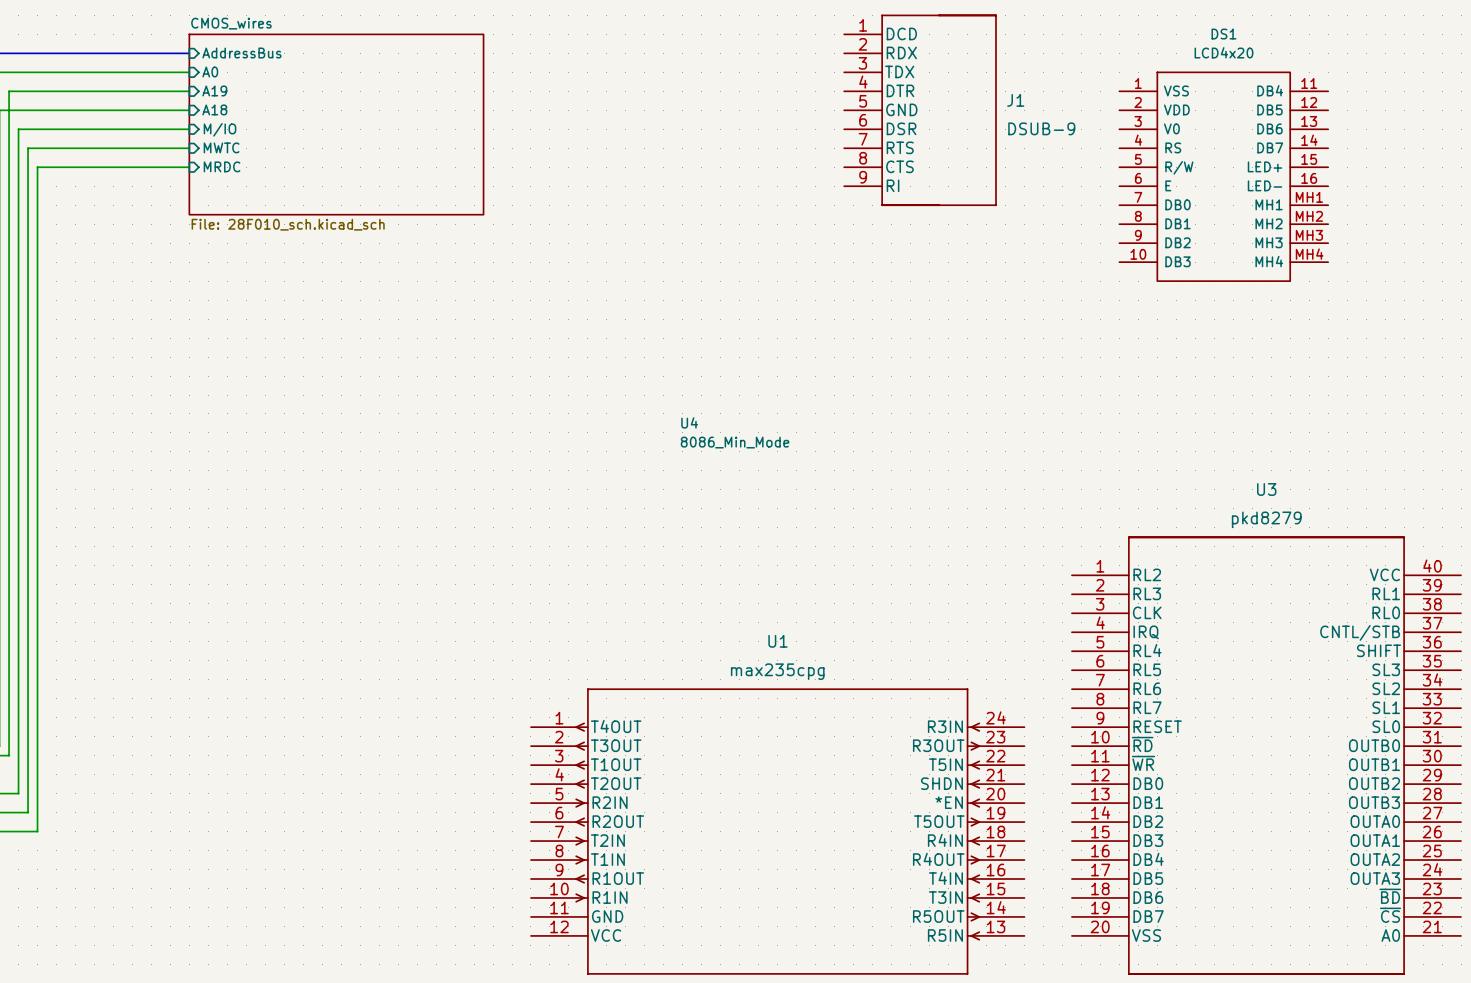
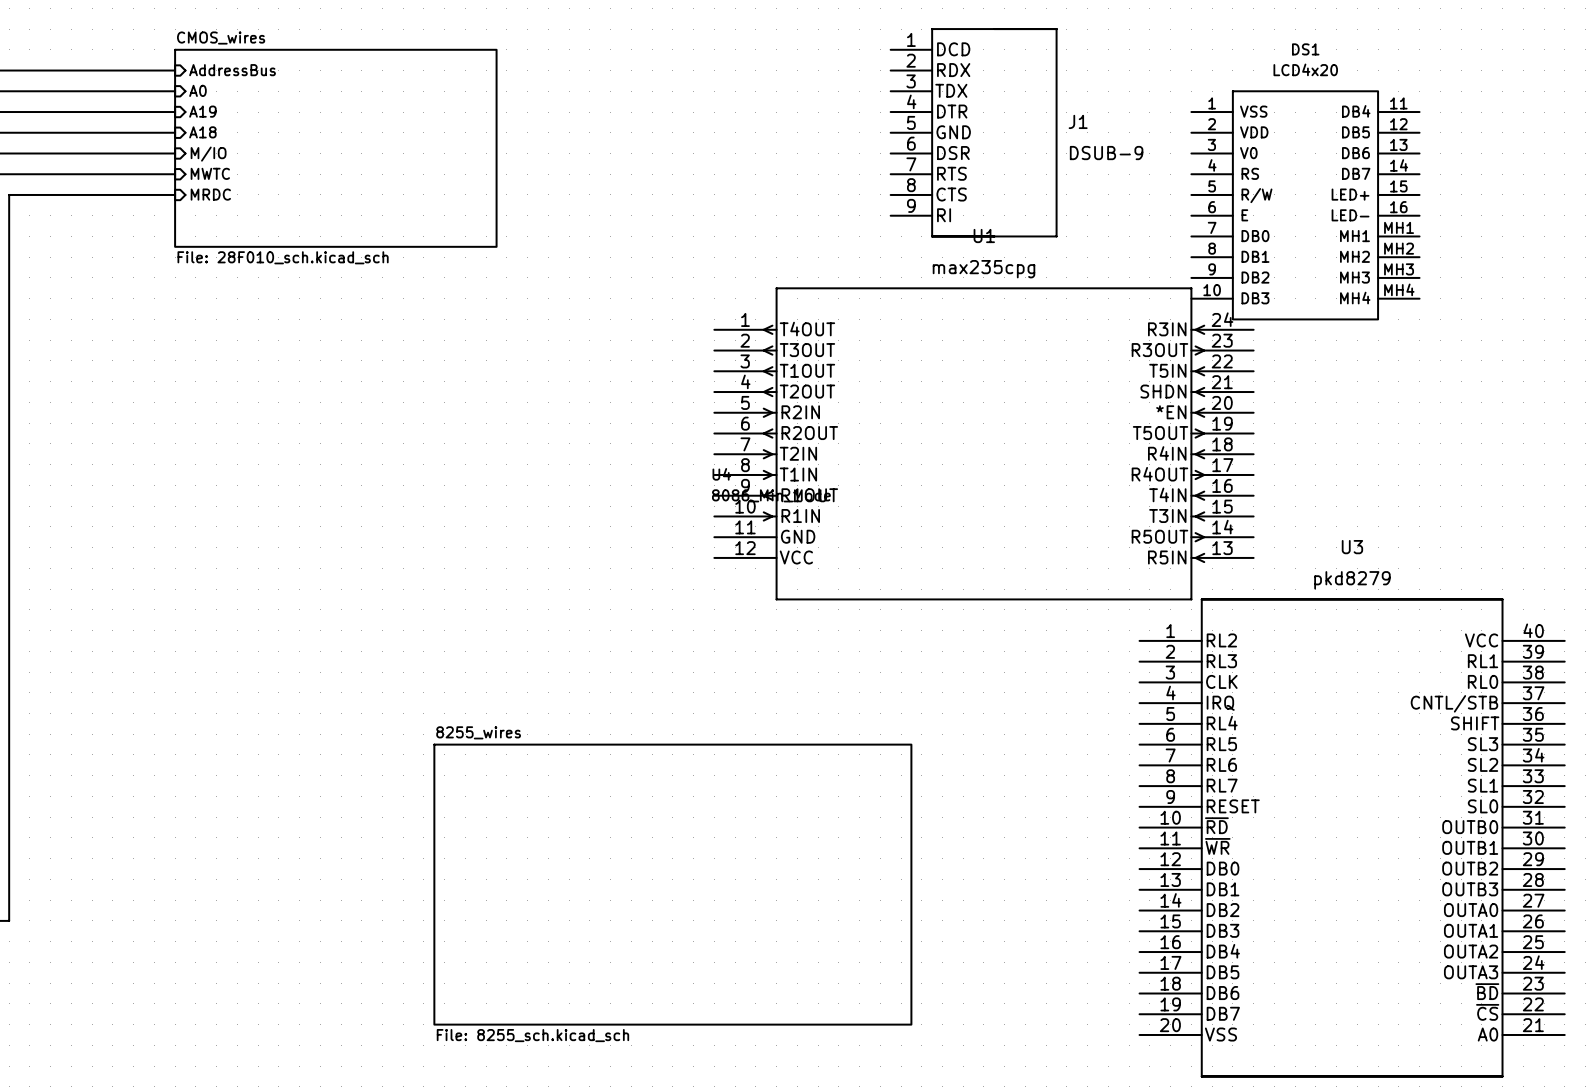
sheet 8255_wires: none -> File: 8255_sch.kicad_sch (672, 884)
U1 position: (777, 831) -> (983, 443)

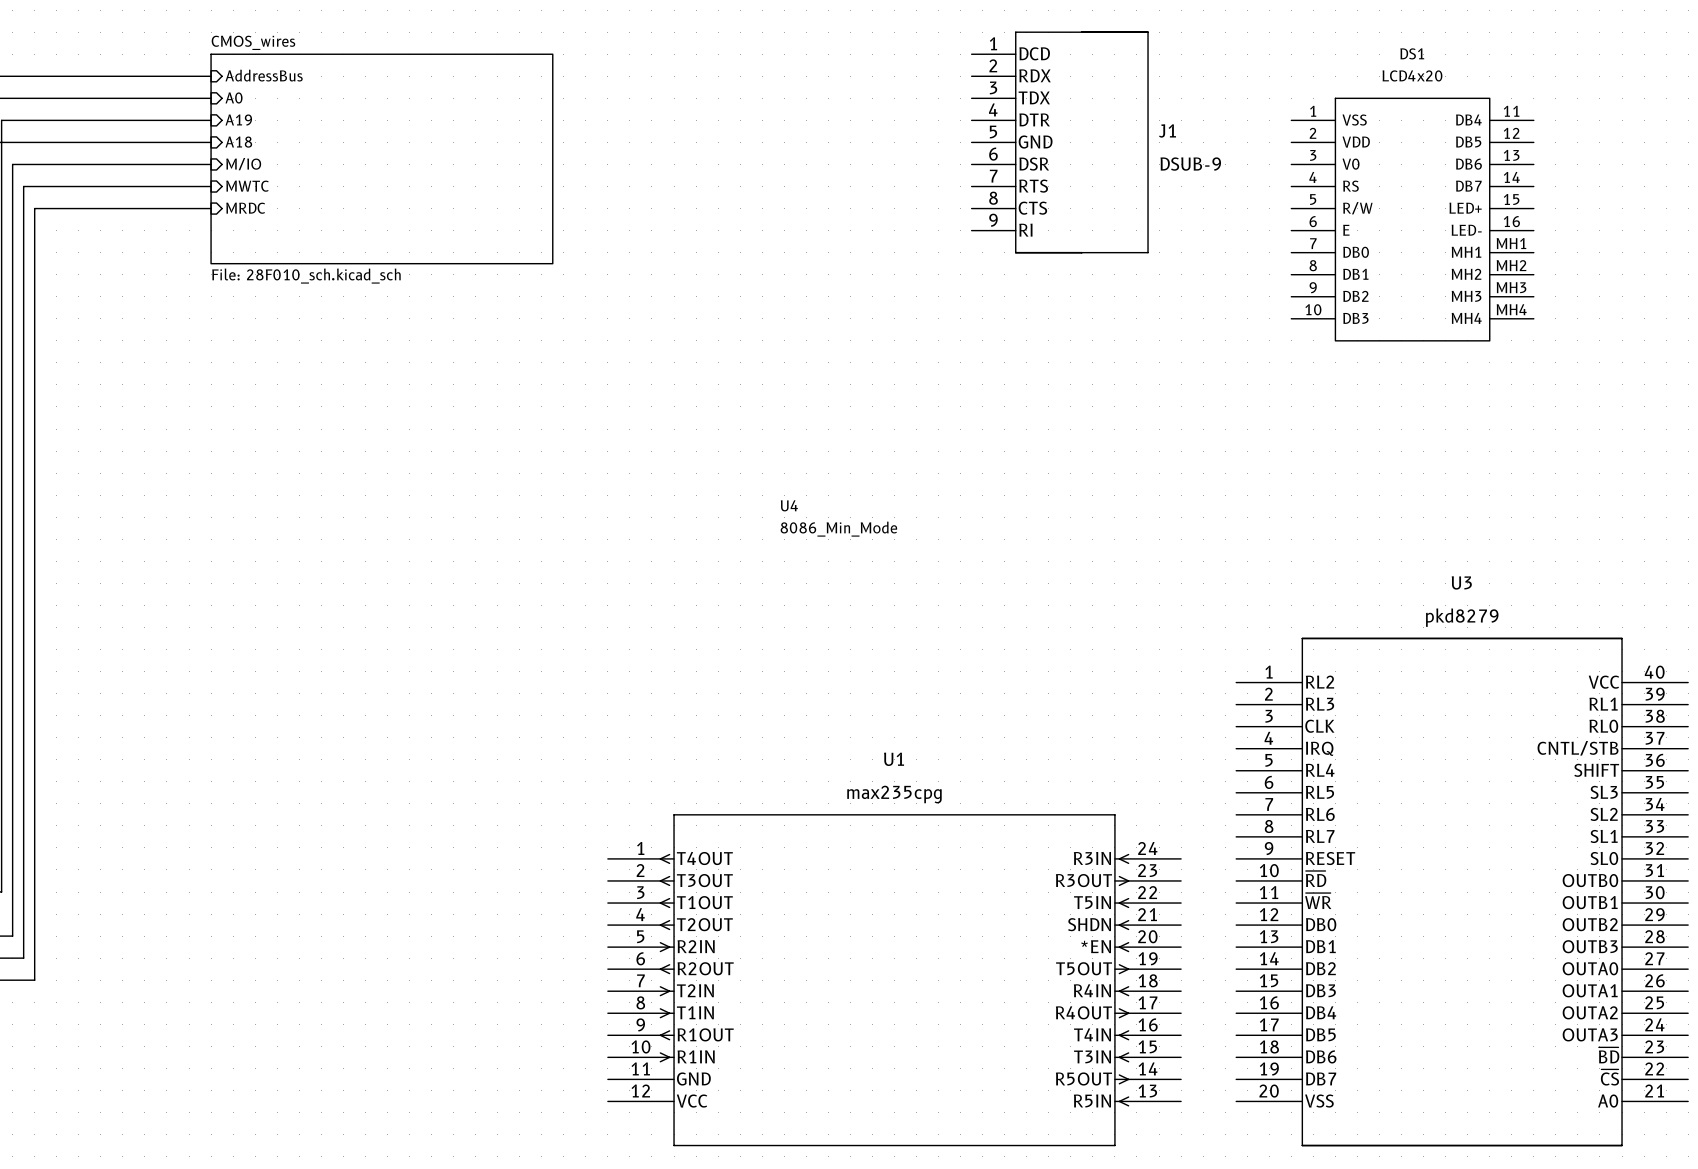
U1 position: (983, 443) -> (894, 980)
sheet 8255_wires: File: 8255_sch.kicad_sch (672, 884) -> none

